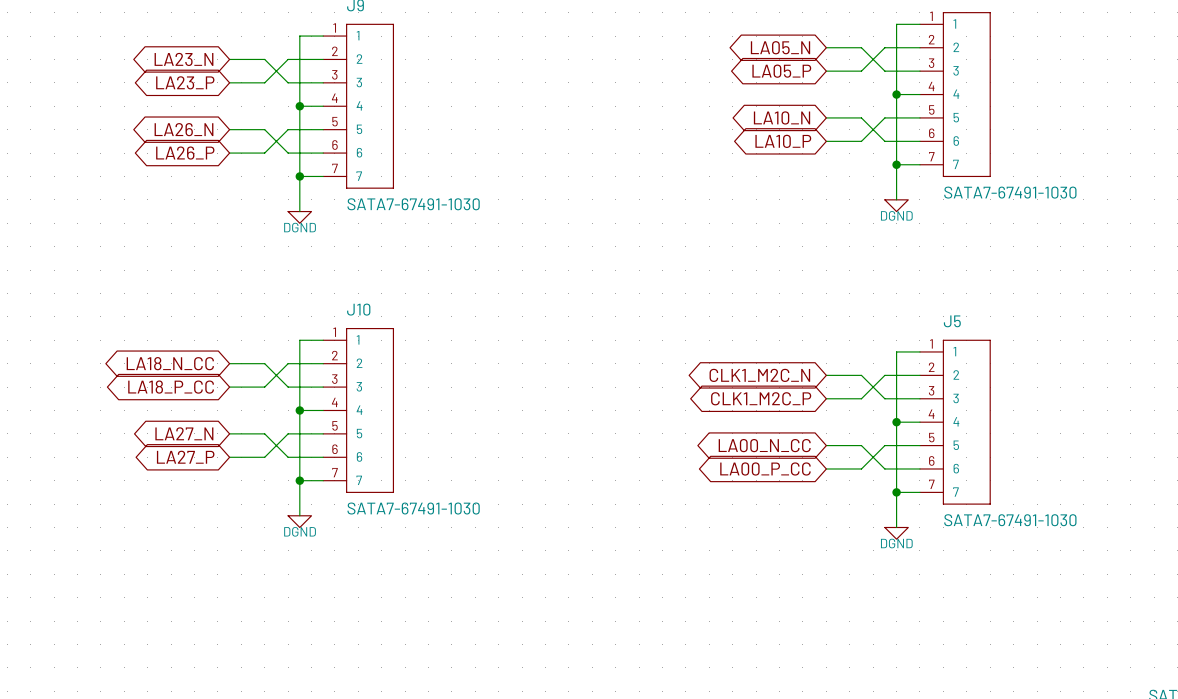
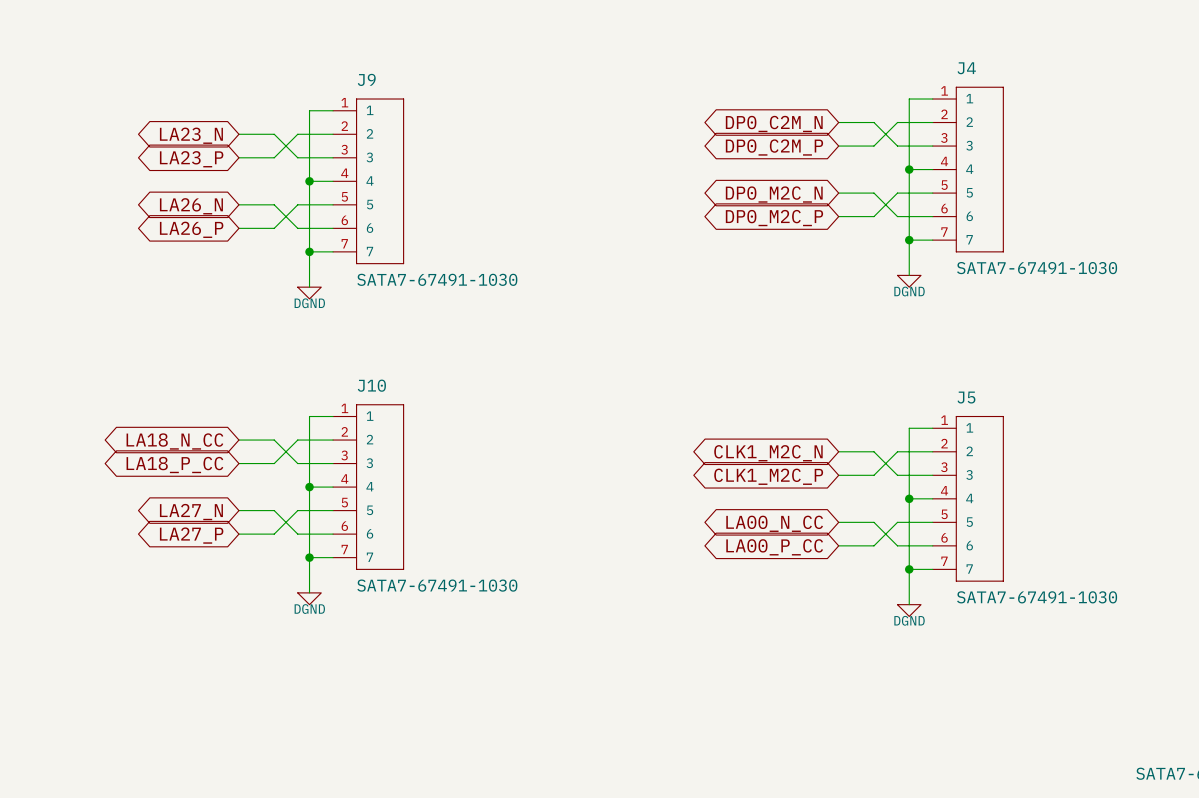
global label: LA05_N (780, 47) -> DP0_C2M_N (774, 123)
global label: LA05_P (781, 71) -> DP0_C2M_P (774, 147)
global label: LA10_N (782, 117) -> DP0_M2C_N (774, 194)
global label: LA10_P (783, 141) -> DP0_M2C_P (774, 218)

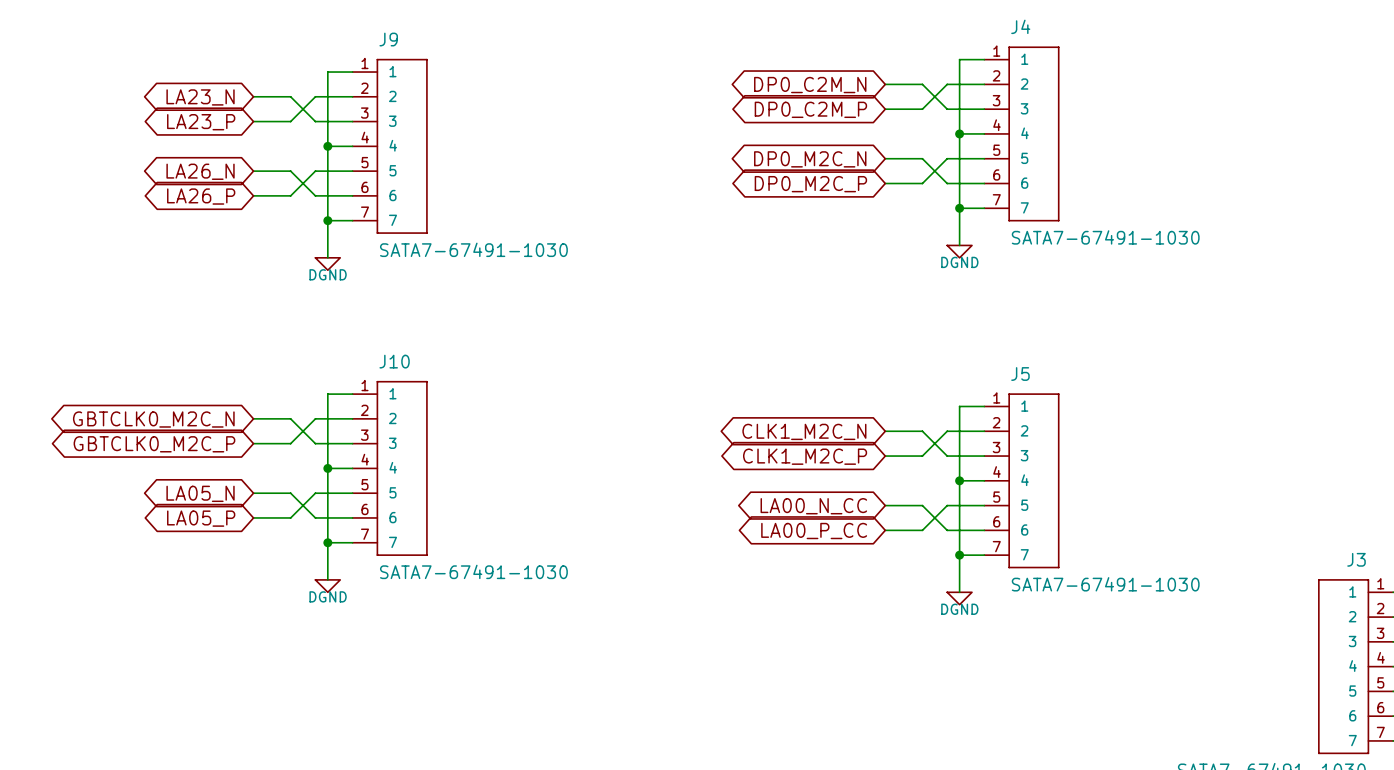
global label: LA18_N_CC (174, 441) -> GBTCLK0_M2C_N (153, 419)
global label: LA18_P_CC (174, 465) -> GBTCLK0_M2C_P (154, 444)
global label: LA27_N (191, 512) -> LA05_N (200, 493)
global label: LA27_P (191, 535) -> LA05_P (201, 518)

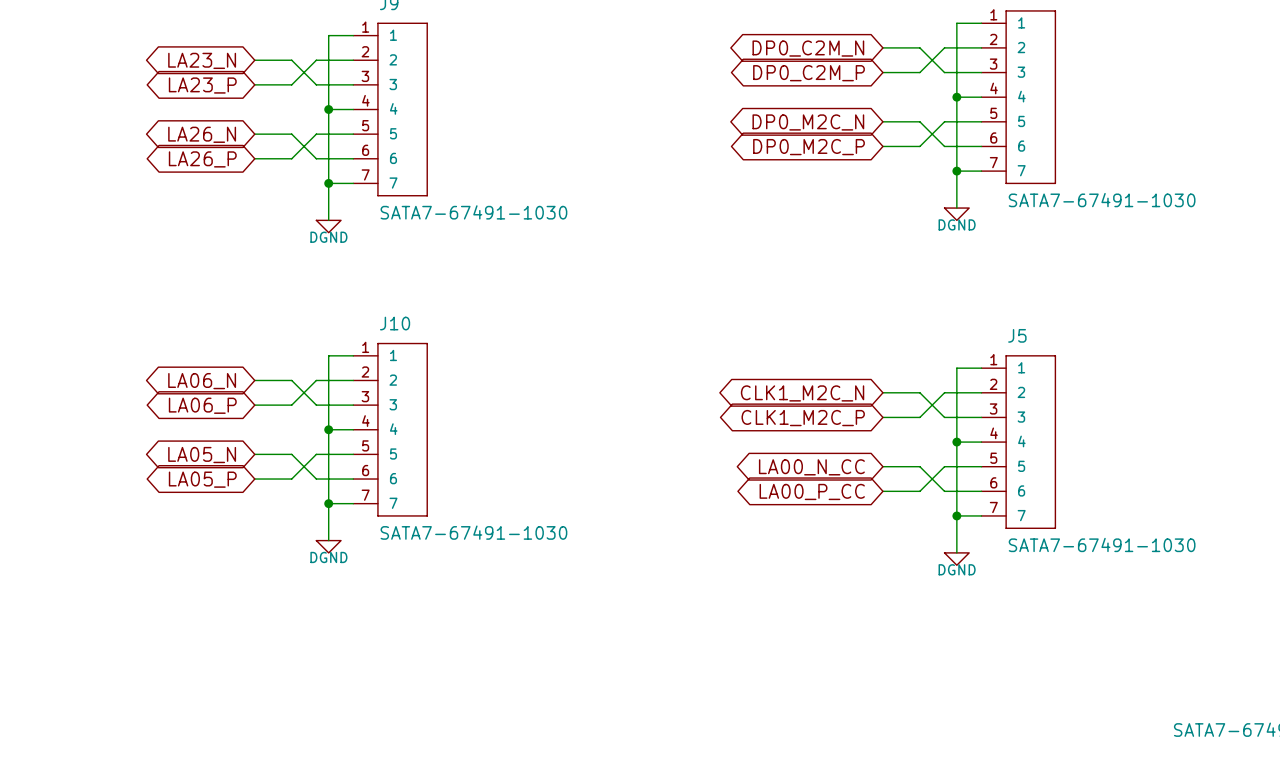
global label: GBTCLK0_M2C_N (153, 419) -> LA06_N (202, 381)
global label: GBTCLK0_M2C_P (154, 444) -> LA06_P (202, 405)

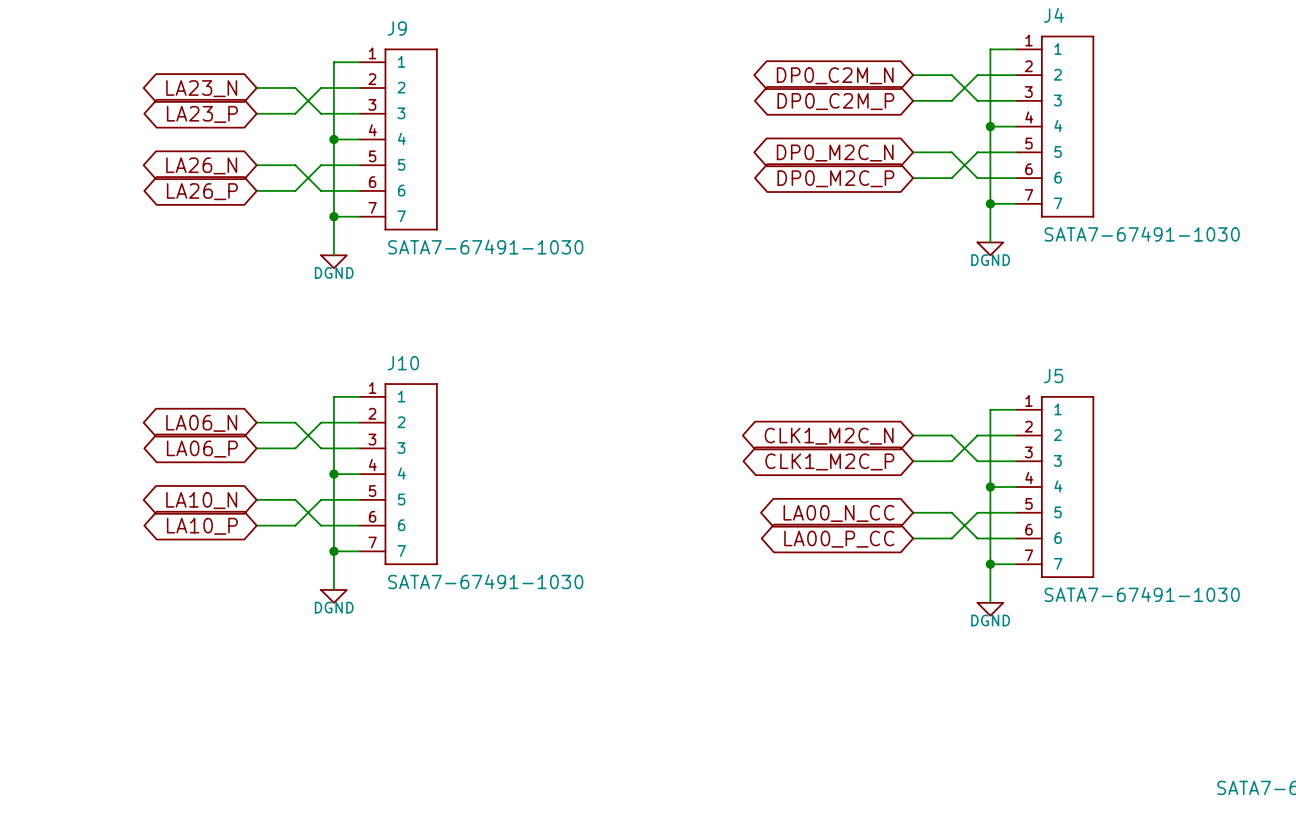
global label: LA05_N (202, 455) -> LA10_N (201, 500)
global label: LA05_P (202, 479) -> LA10_P (202, 526)

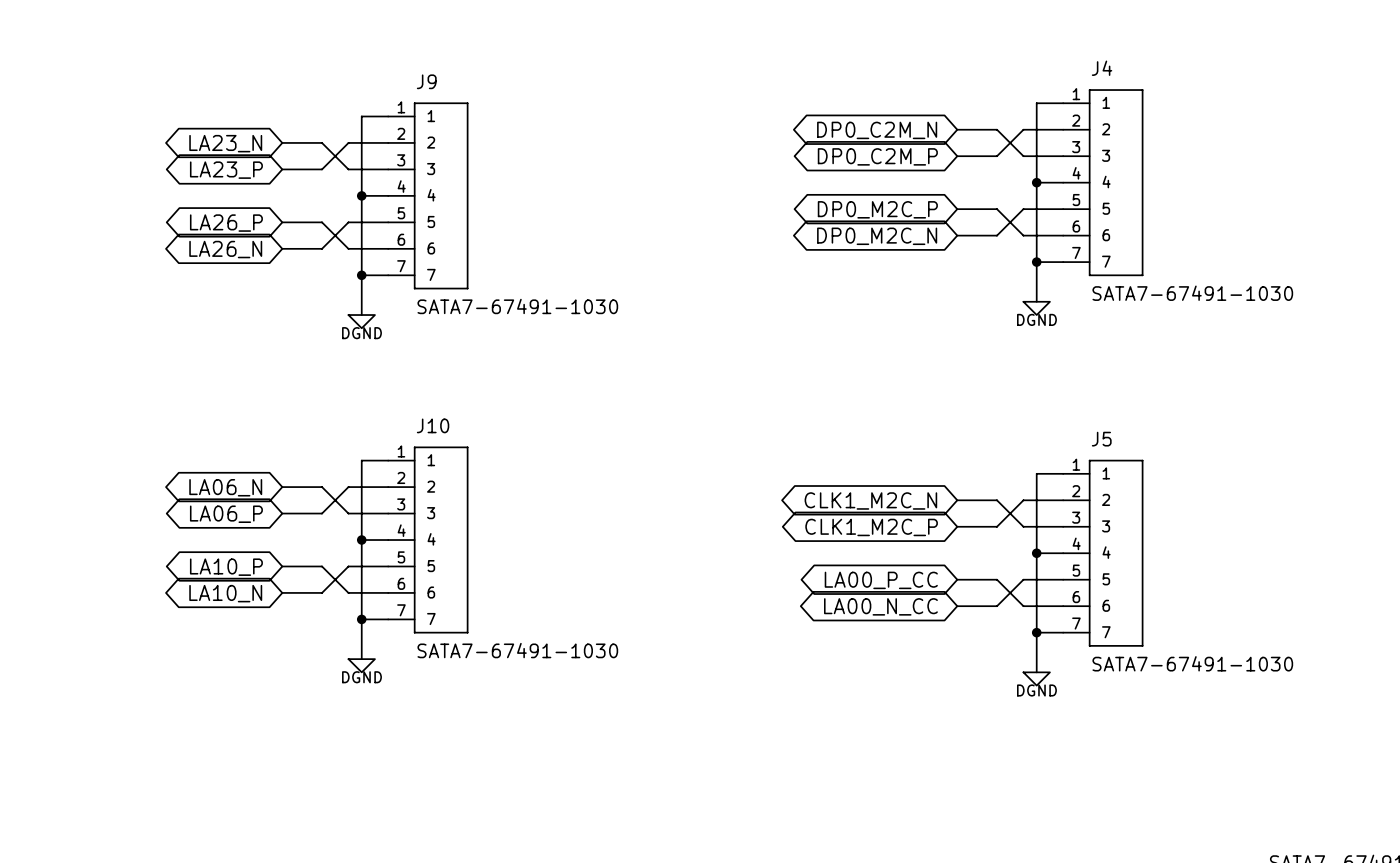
global label: DP0_M2C_N (835, 153) -> DP0_M2C_P (877, 209)
global label: LA26_N (201, 165) -> LA26_P (226, 223)
global label: DP0_M2C_P (835, 178) -> DP0_M2C_N (877, 236)
global label: LA26_P (202, 191) -> LA26_N (225, 249)
global label: LA10_N (201, 500) -> LA10_P (226, 567)
global label: LA00_N_CC (838, 513) -> LA00_P_CC (881, 580)
global label: LA10_P (202, 526) -> LA10_N (225, 593)
global label: LA00_P_CC (839, 539) -> LA00_N_CC (880, 606)

